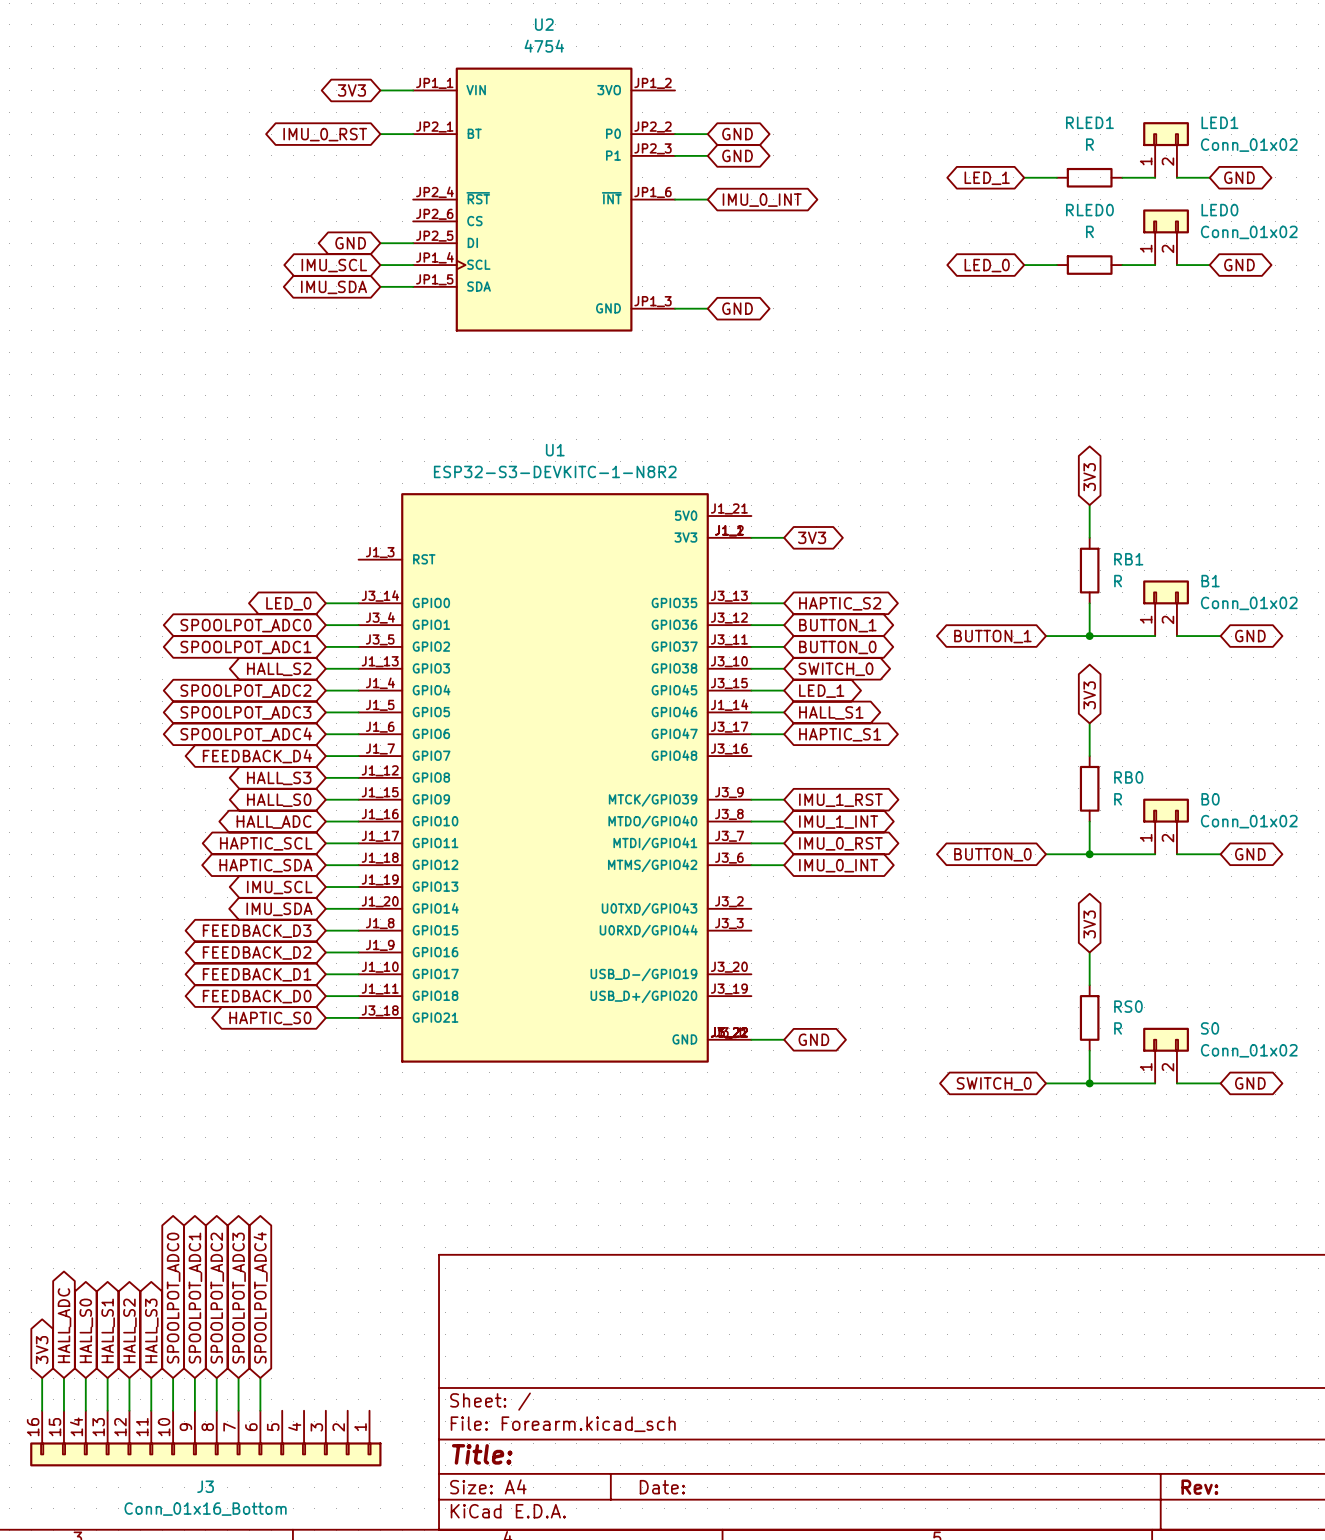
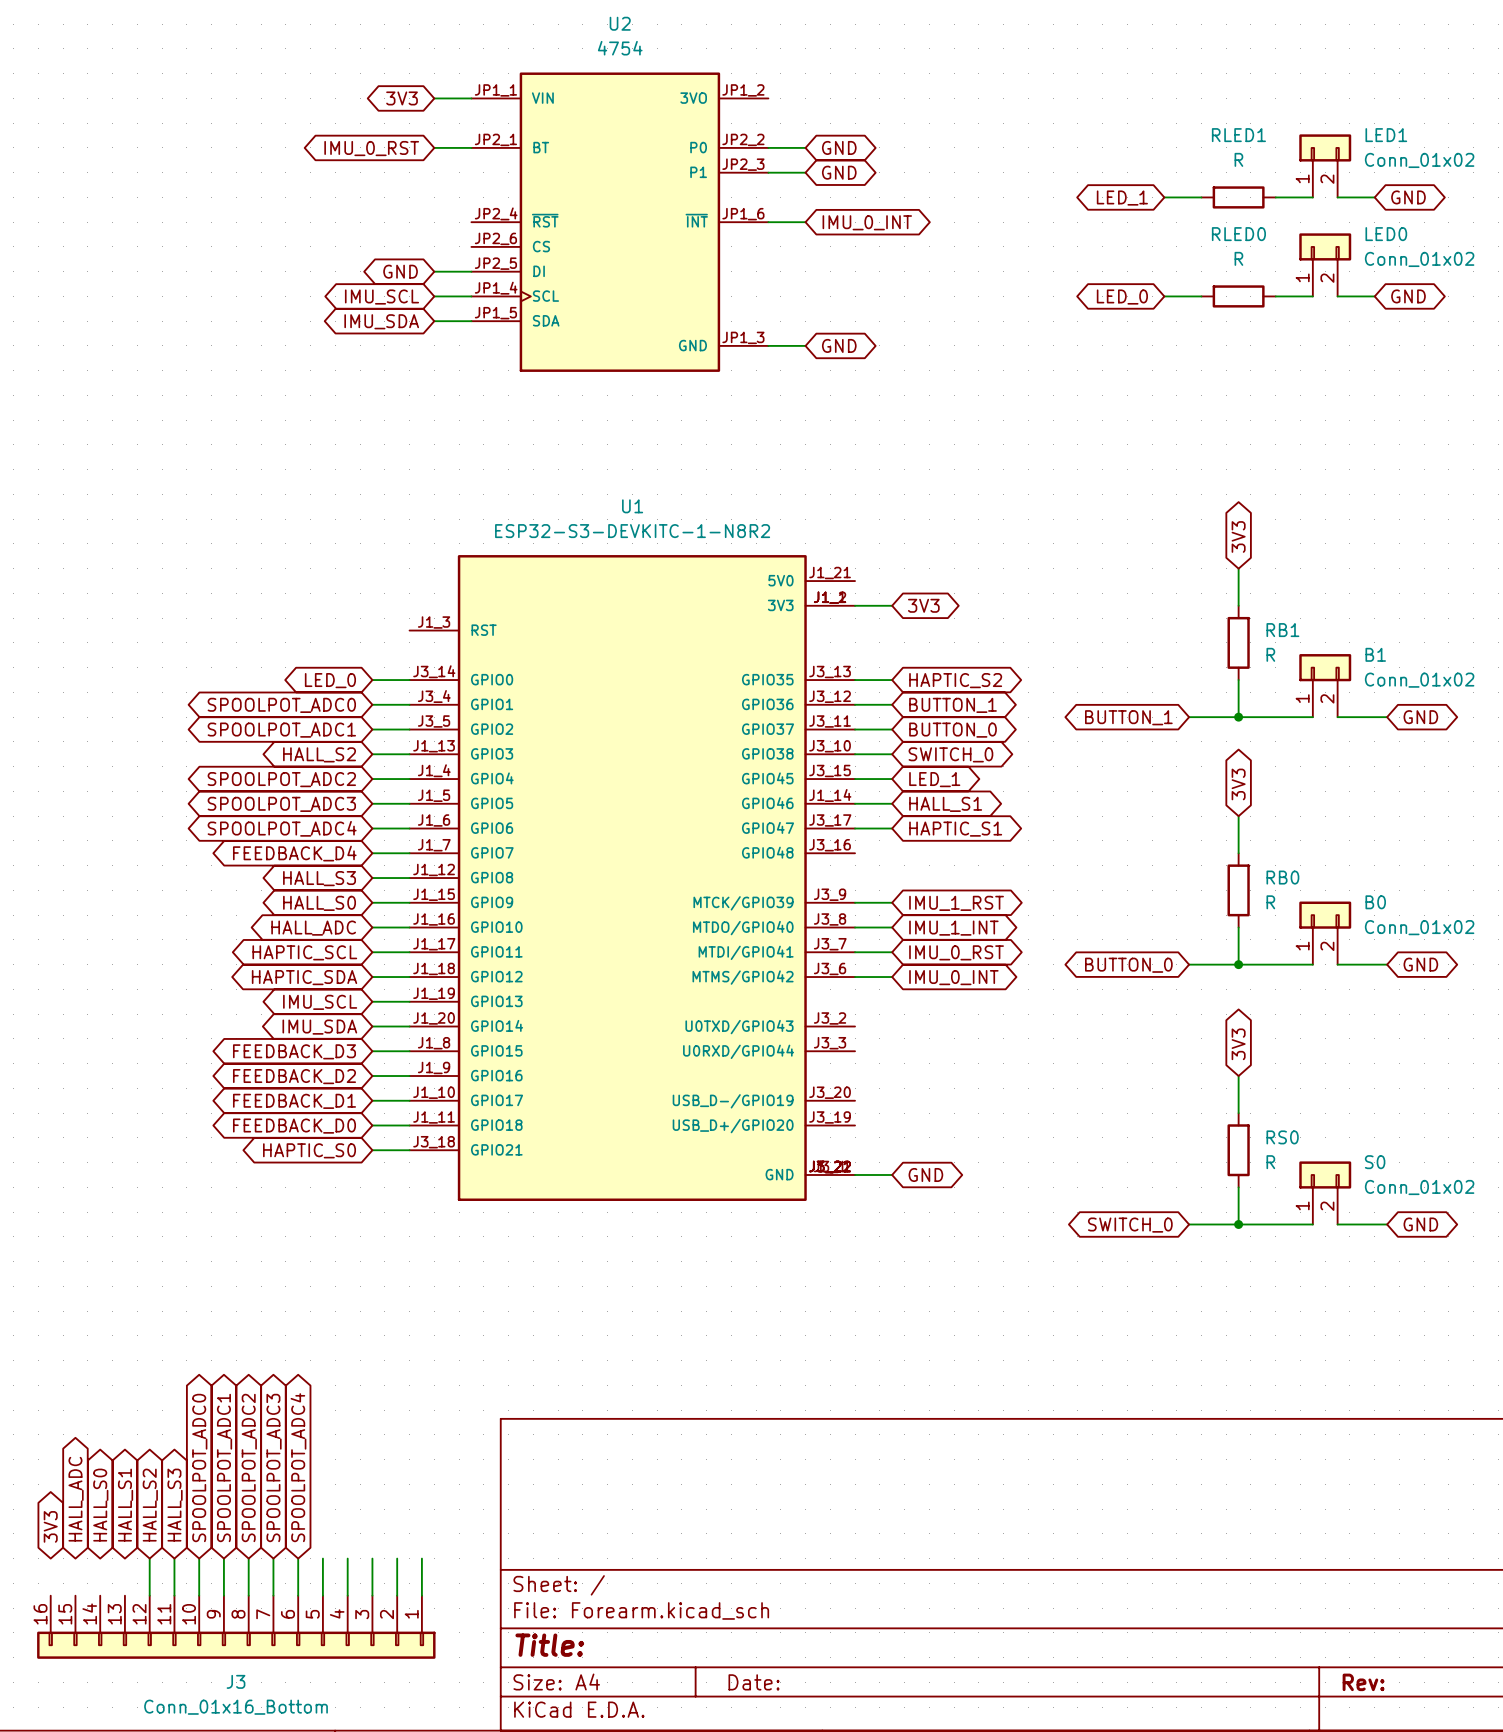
wire: (42, 1378) (42, 1410) -> none
wire: (63, 1378) (63, 1410) -> none
wire: (85, 1378) (85, 1410) -> (322, 1558) (322, 1595)
wire: (107, 1378) (107, 1410) -> (347, 1558) (347, 1595)
wire: none -> (372, 1558) (372, 1595)
wire: none -> (397, 1558) (397, 1595)
wire: none -> (421, 1558) (421, 1595)

